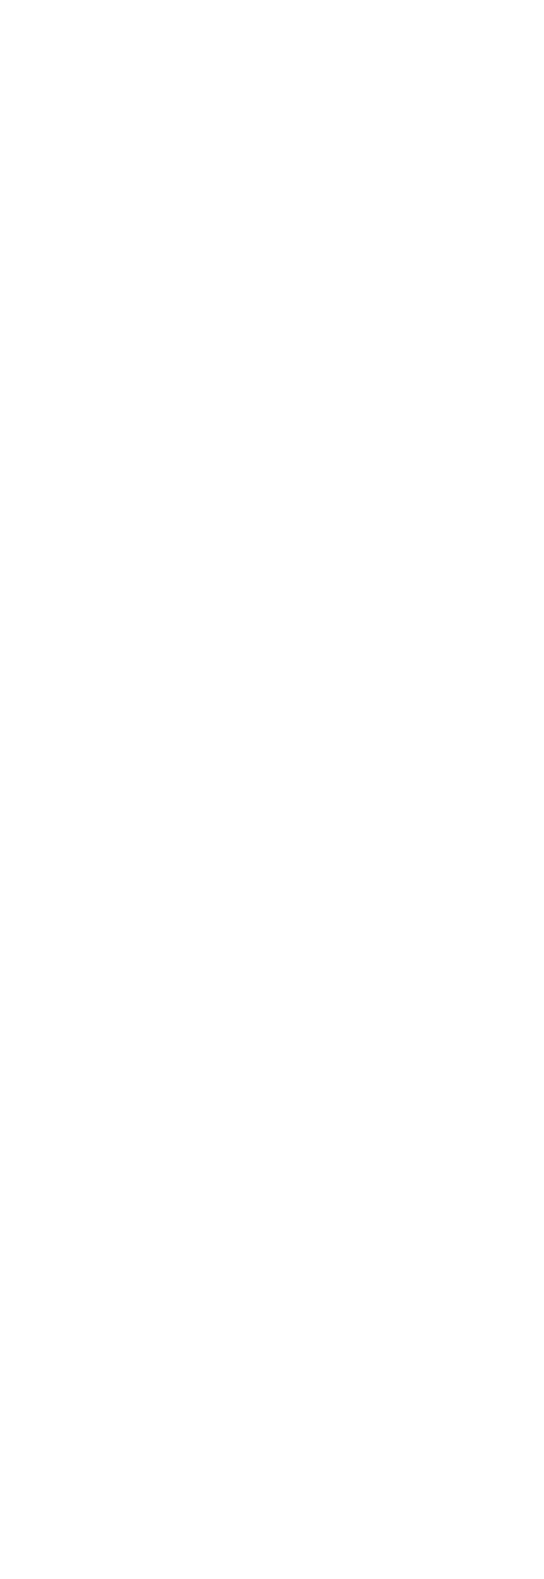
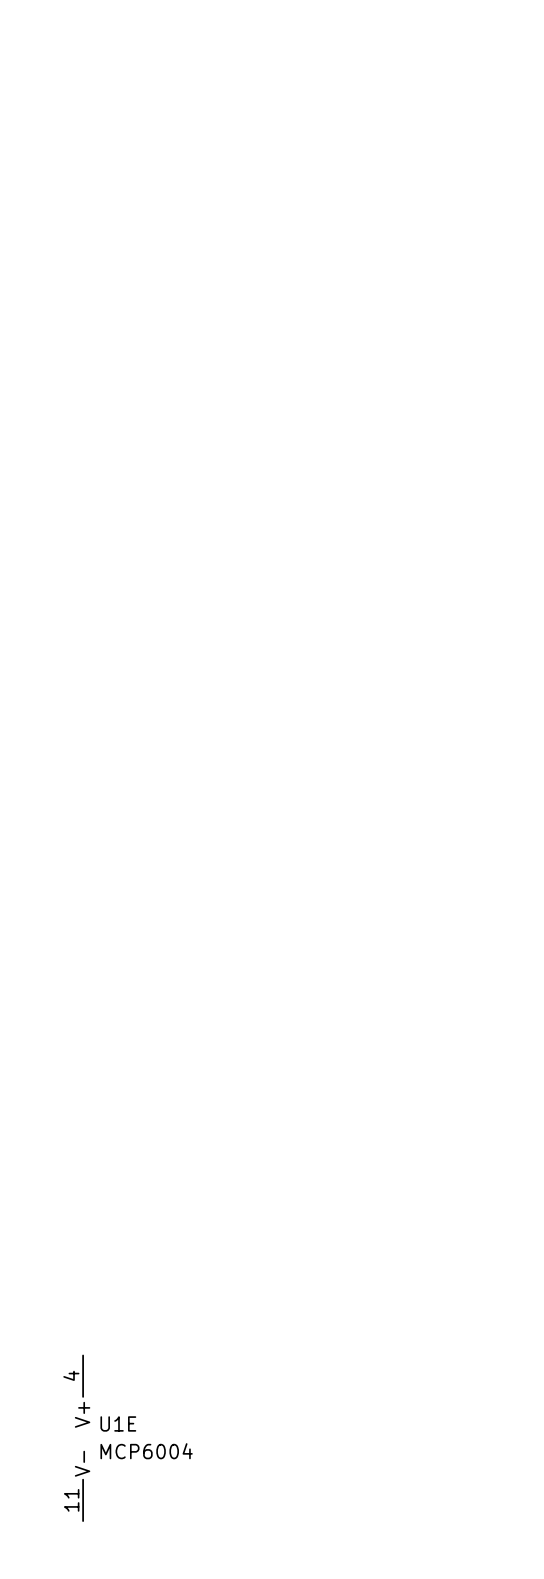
U1E: none -> MCP6004 (83, 1438)

